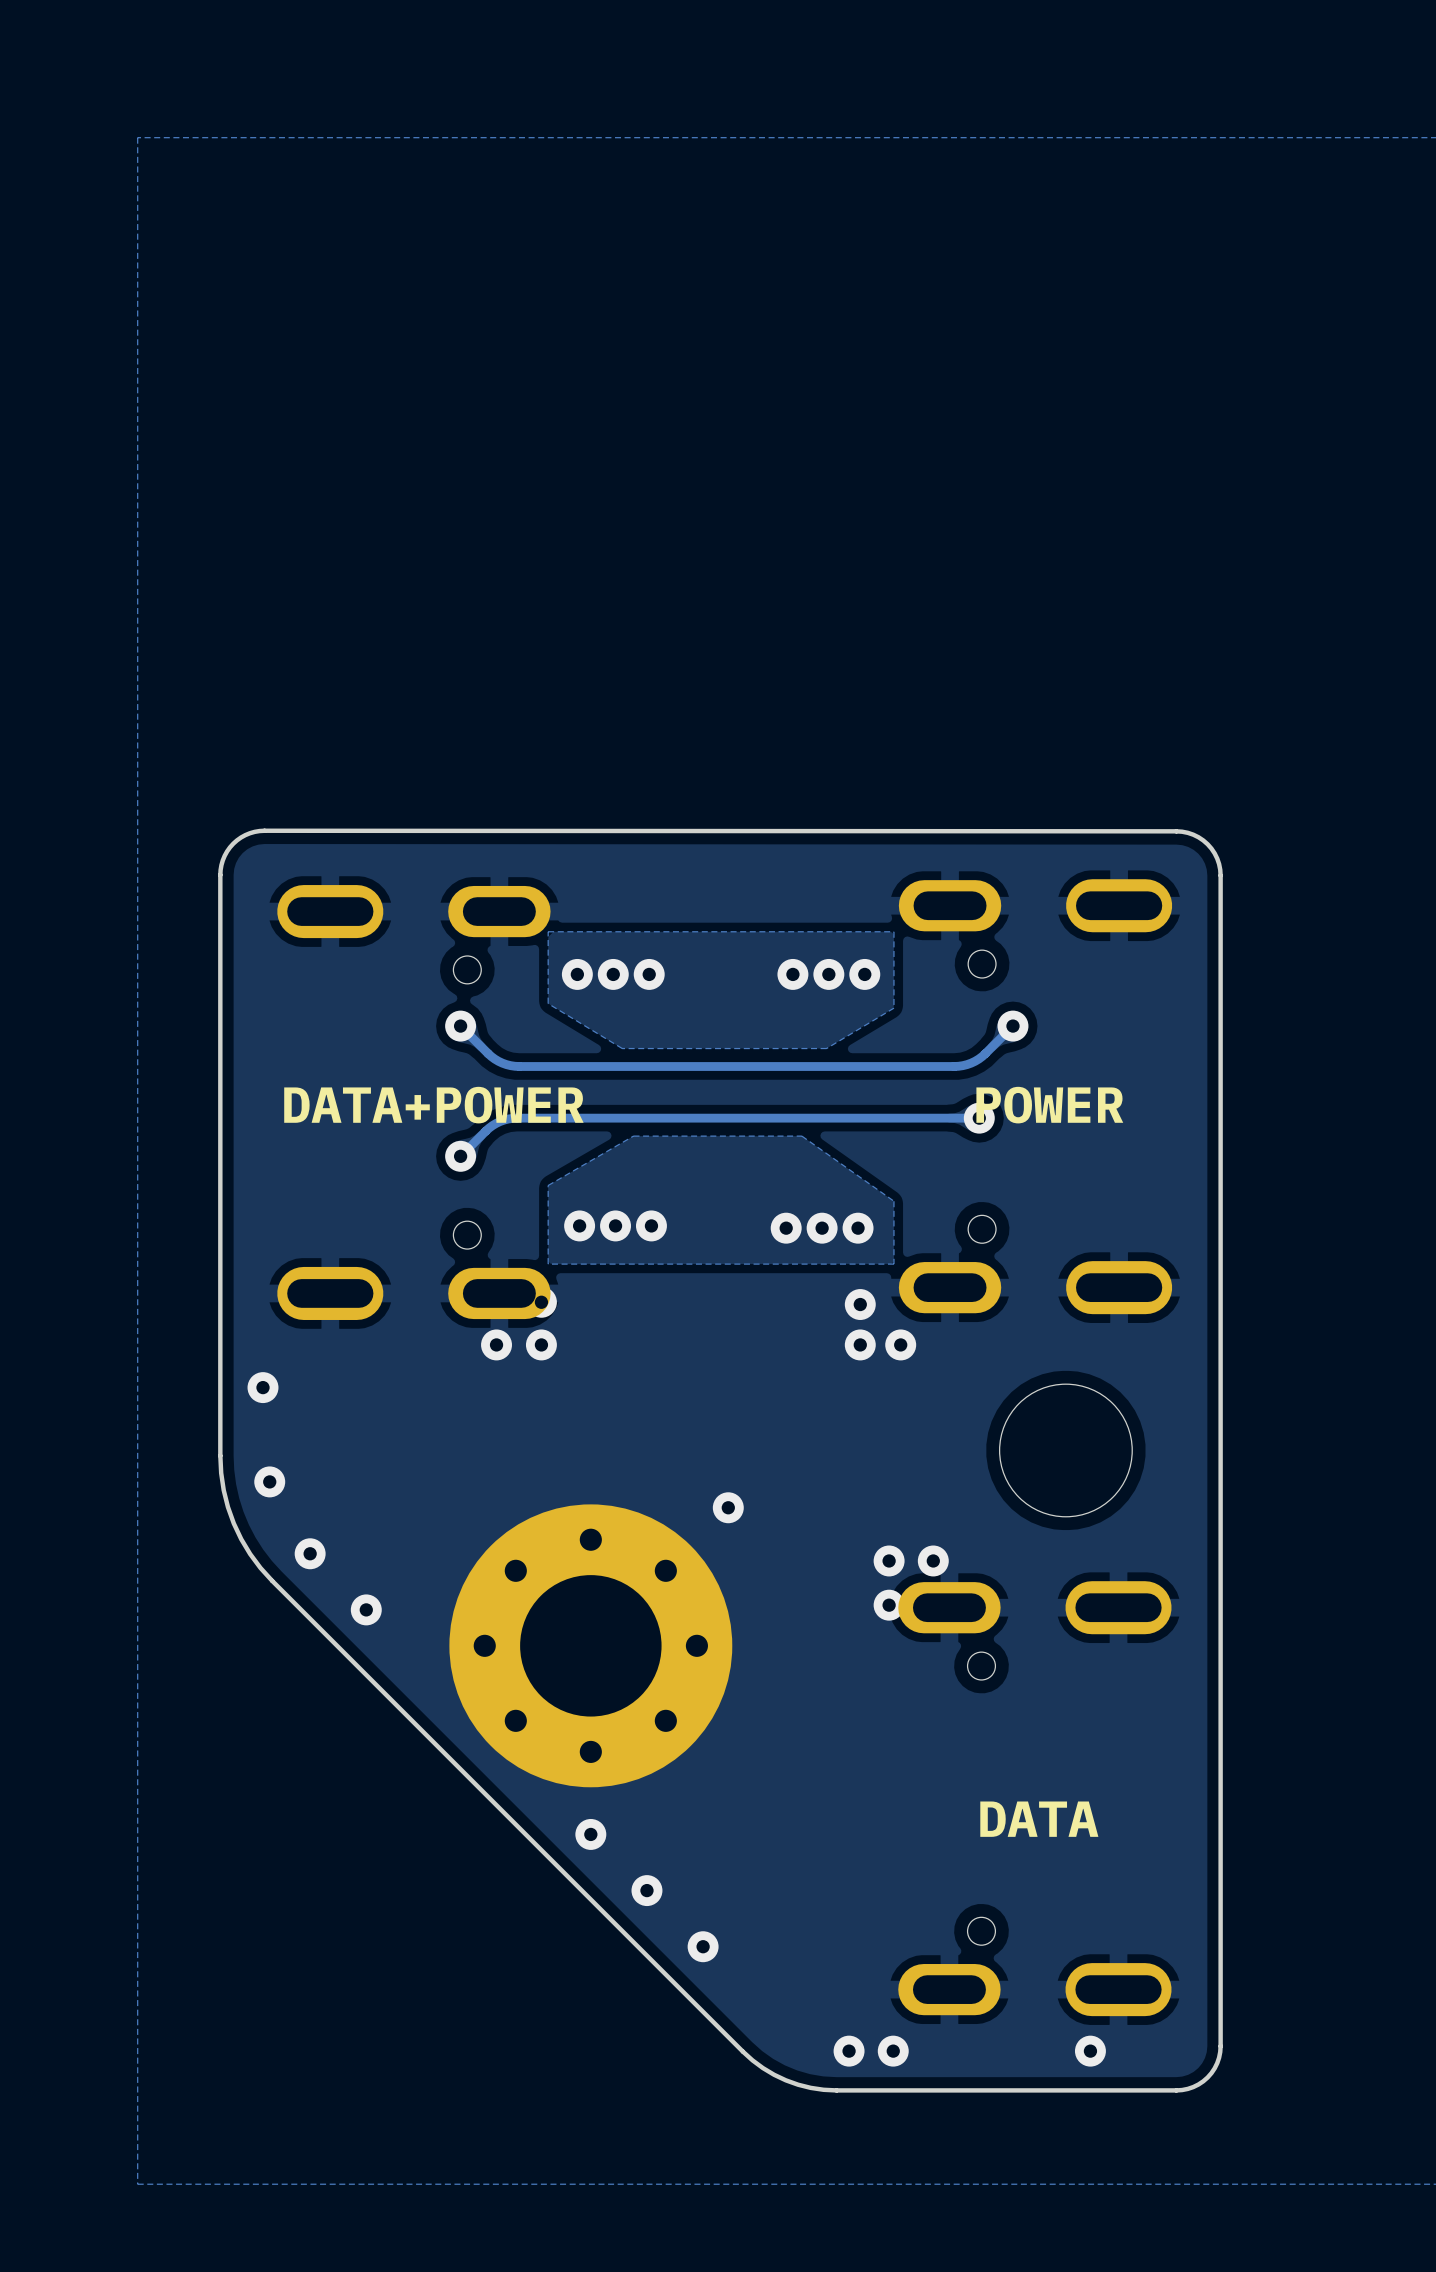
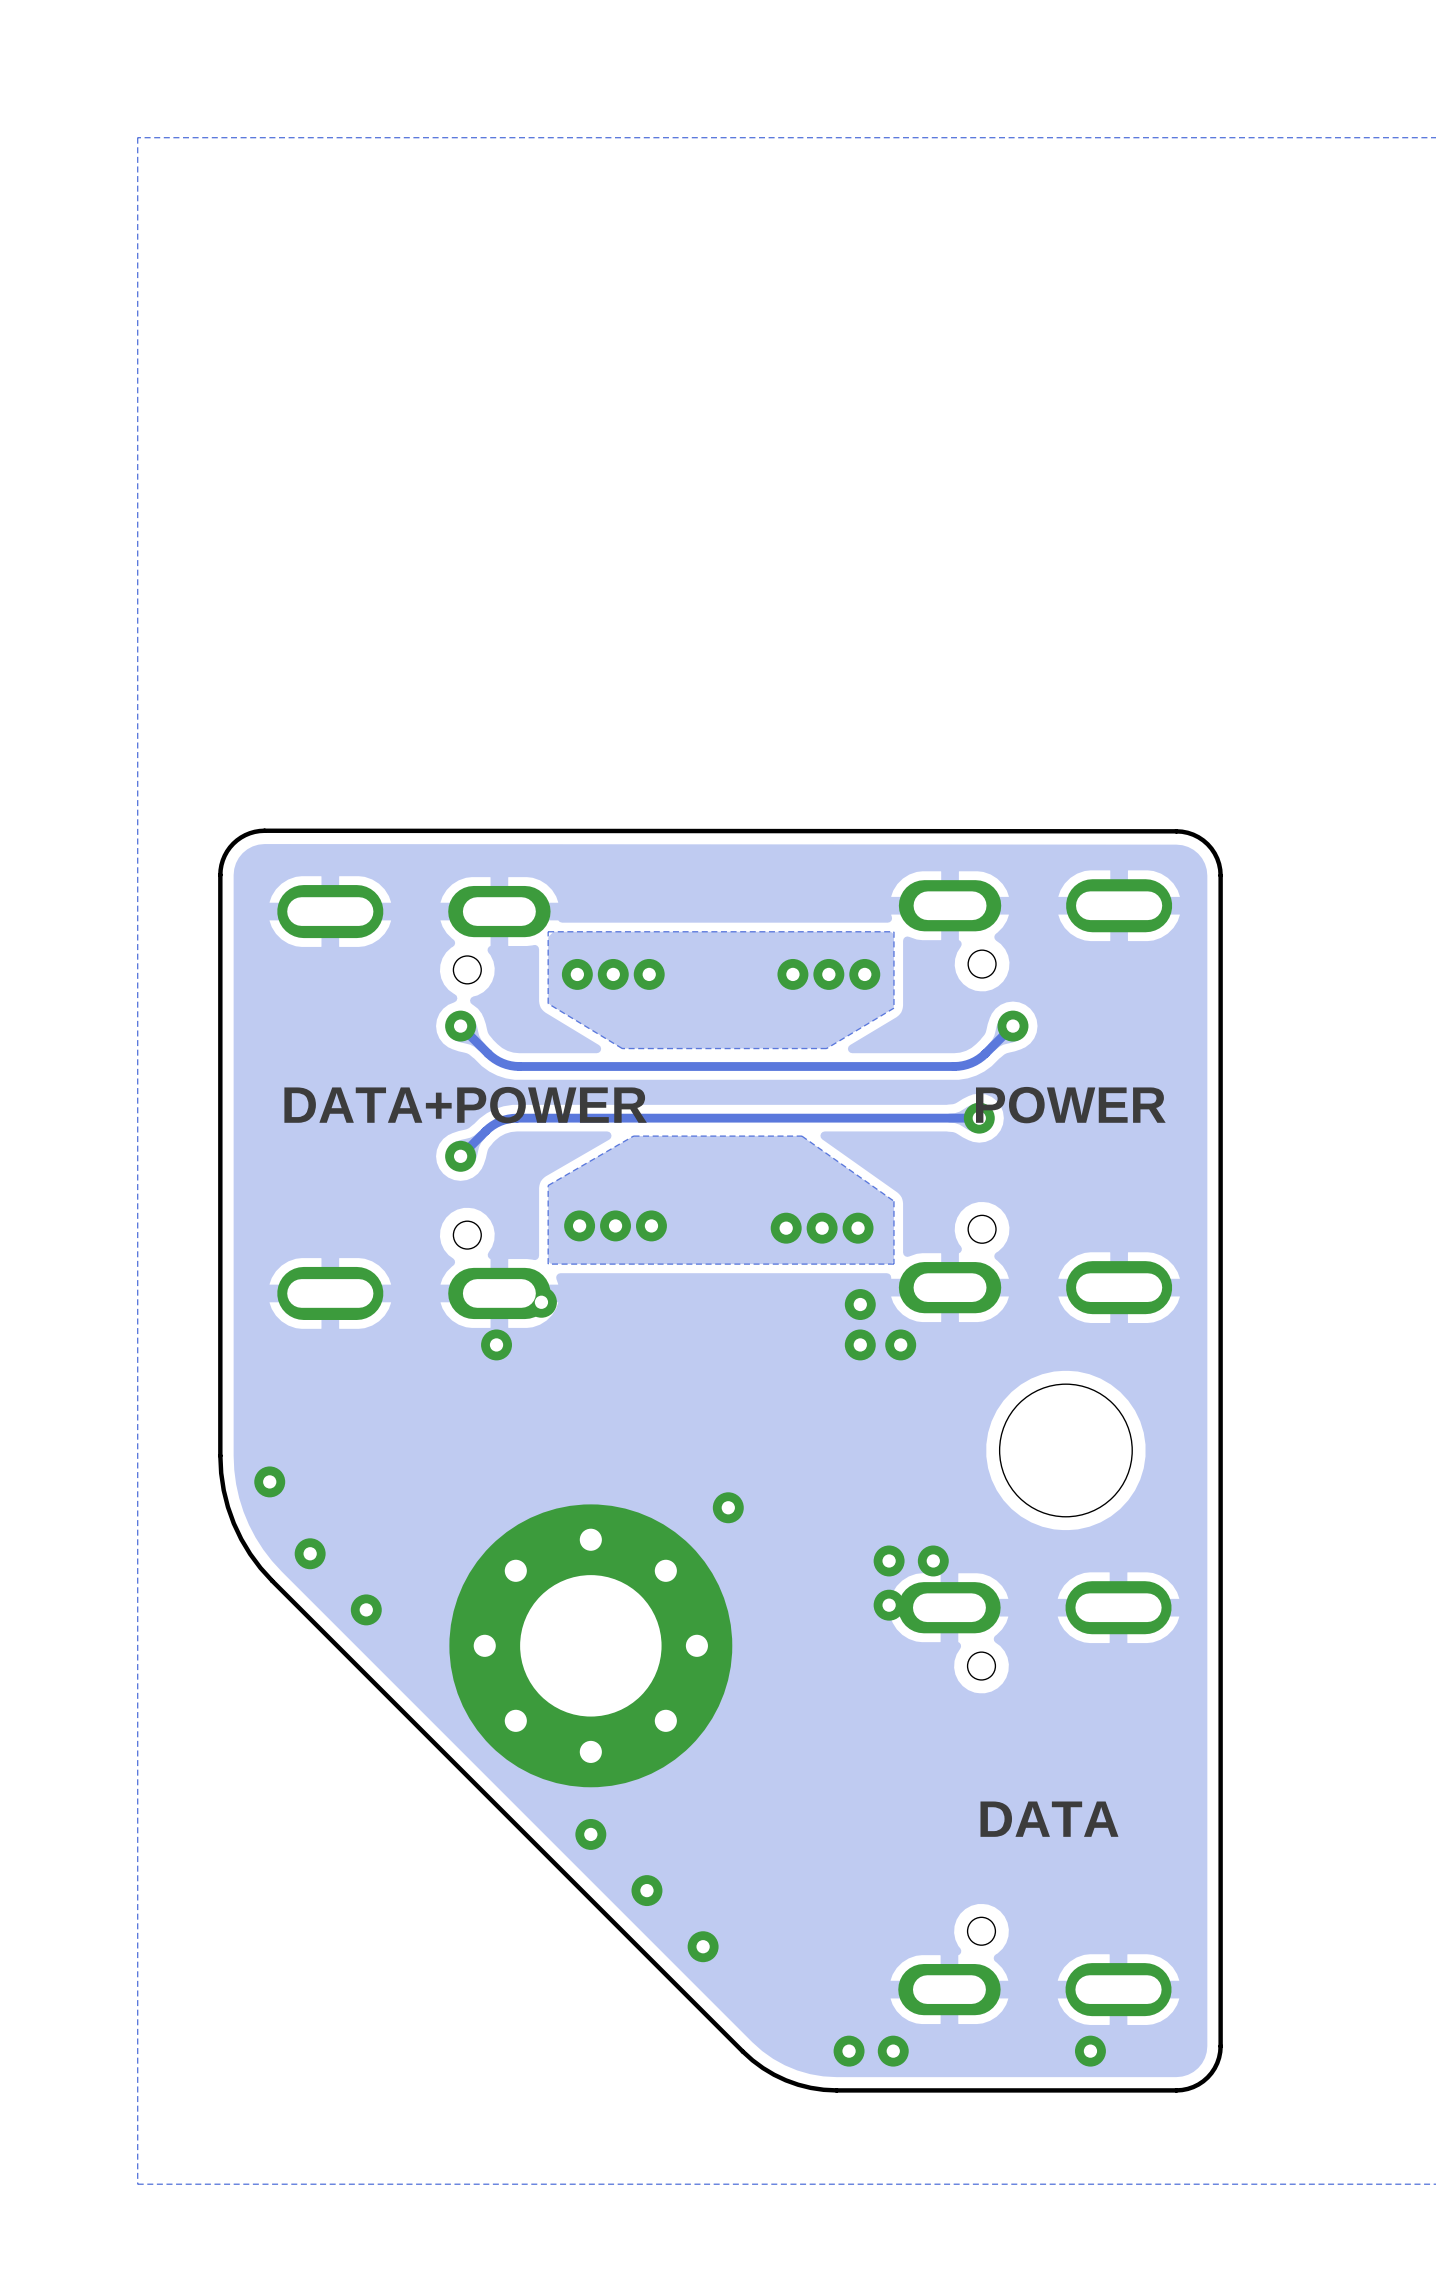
via: (541, 1344) -> none
via: (263, 1387) -> none

